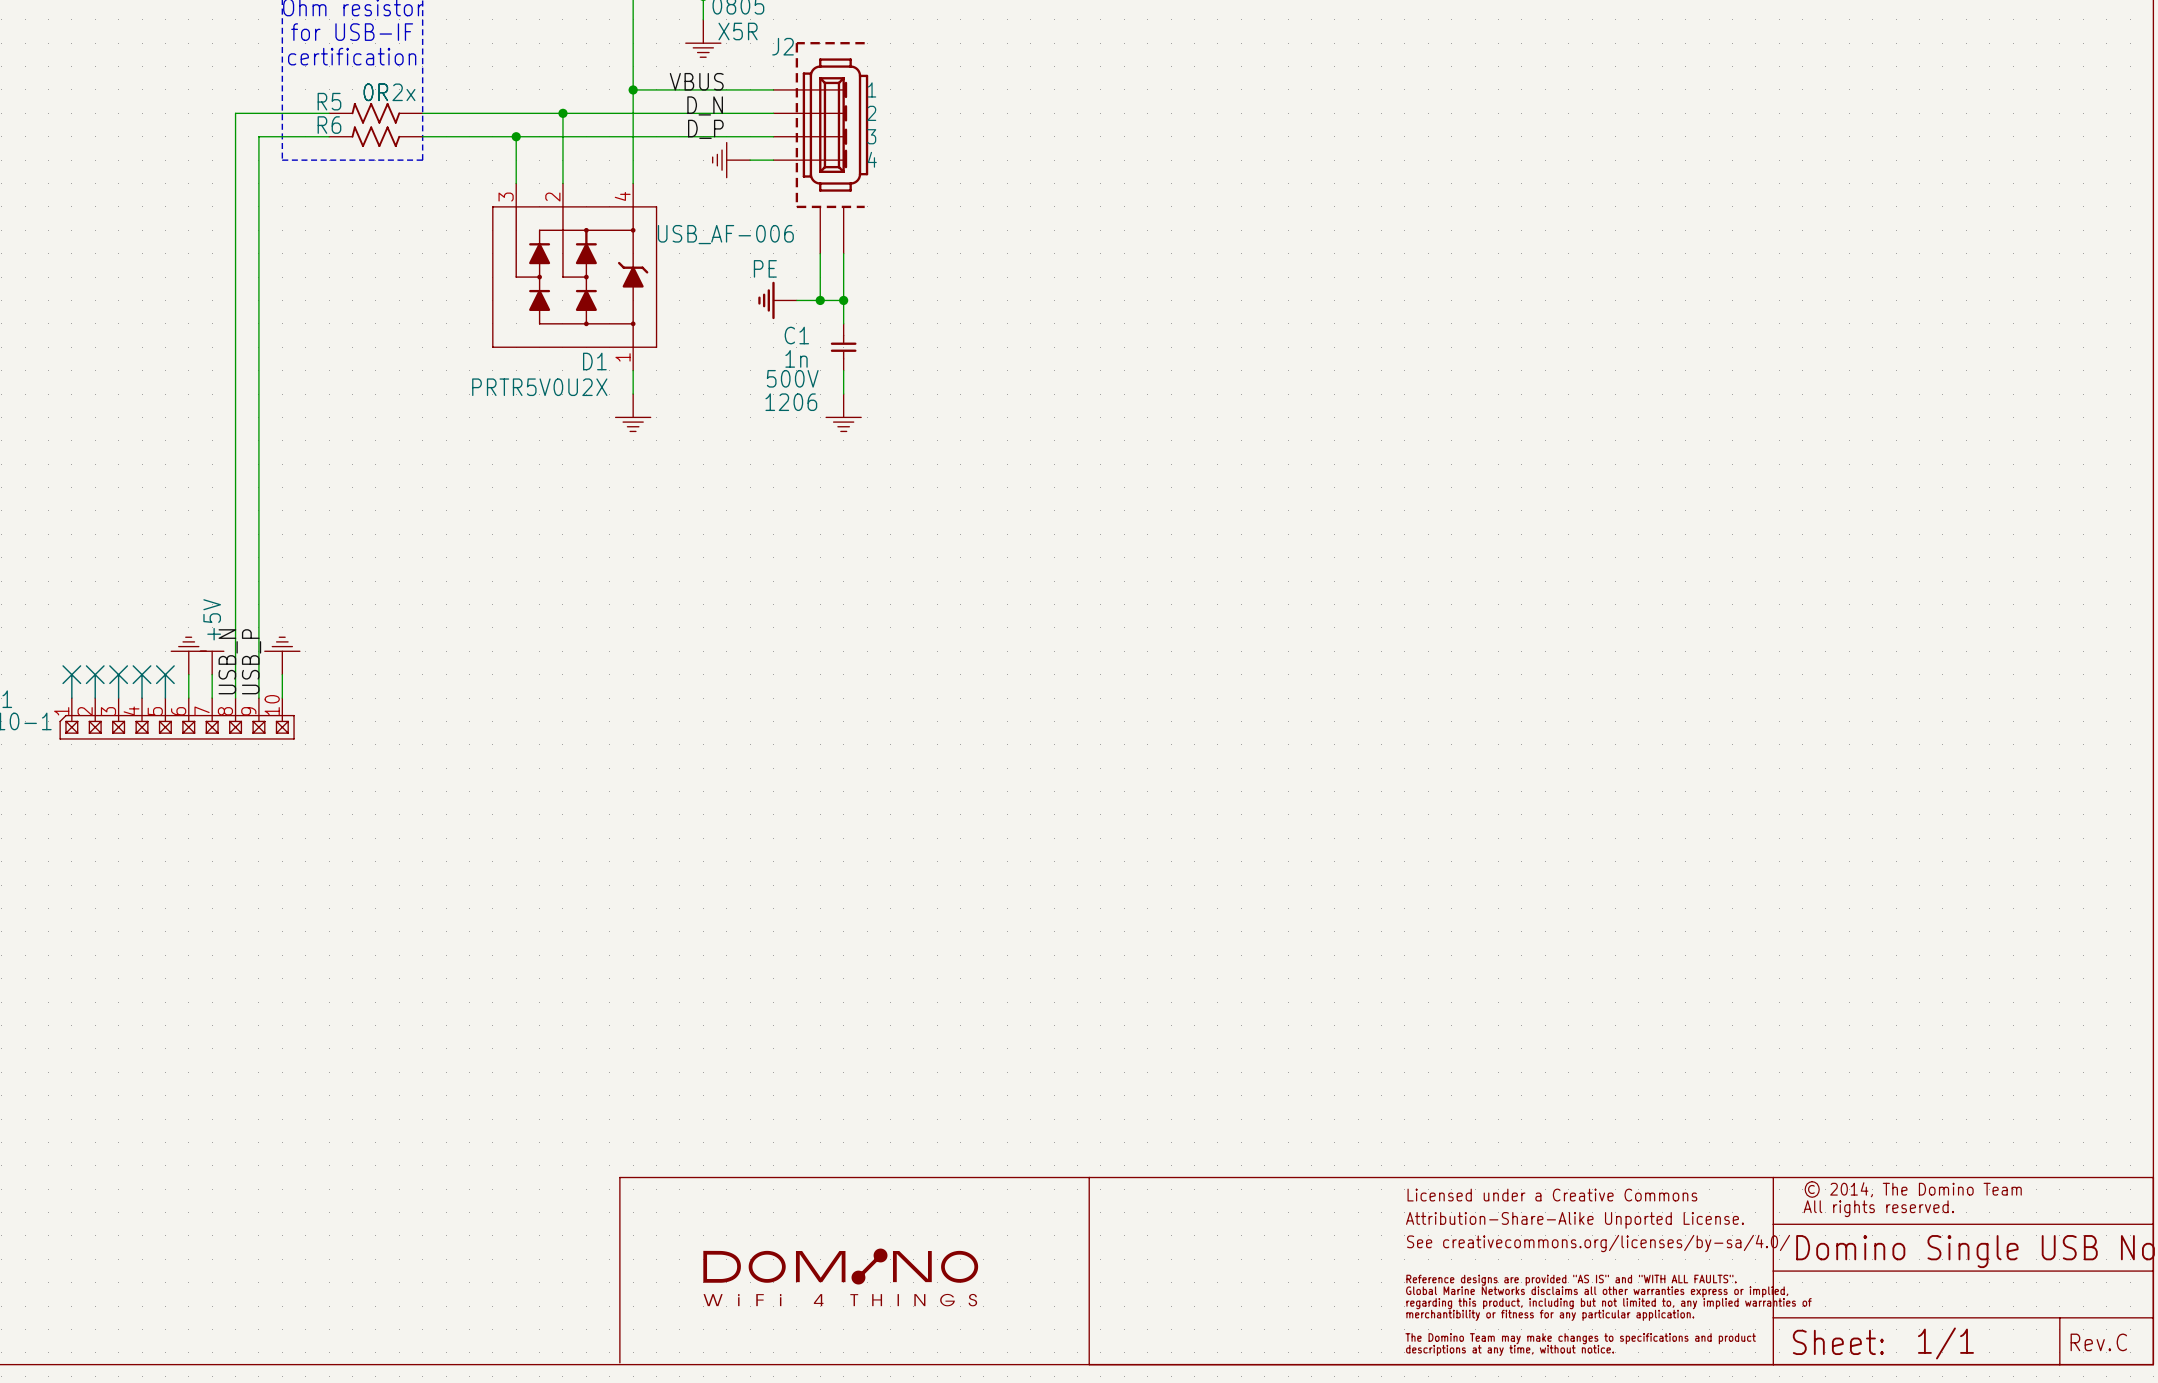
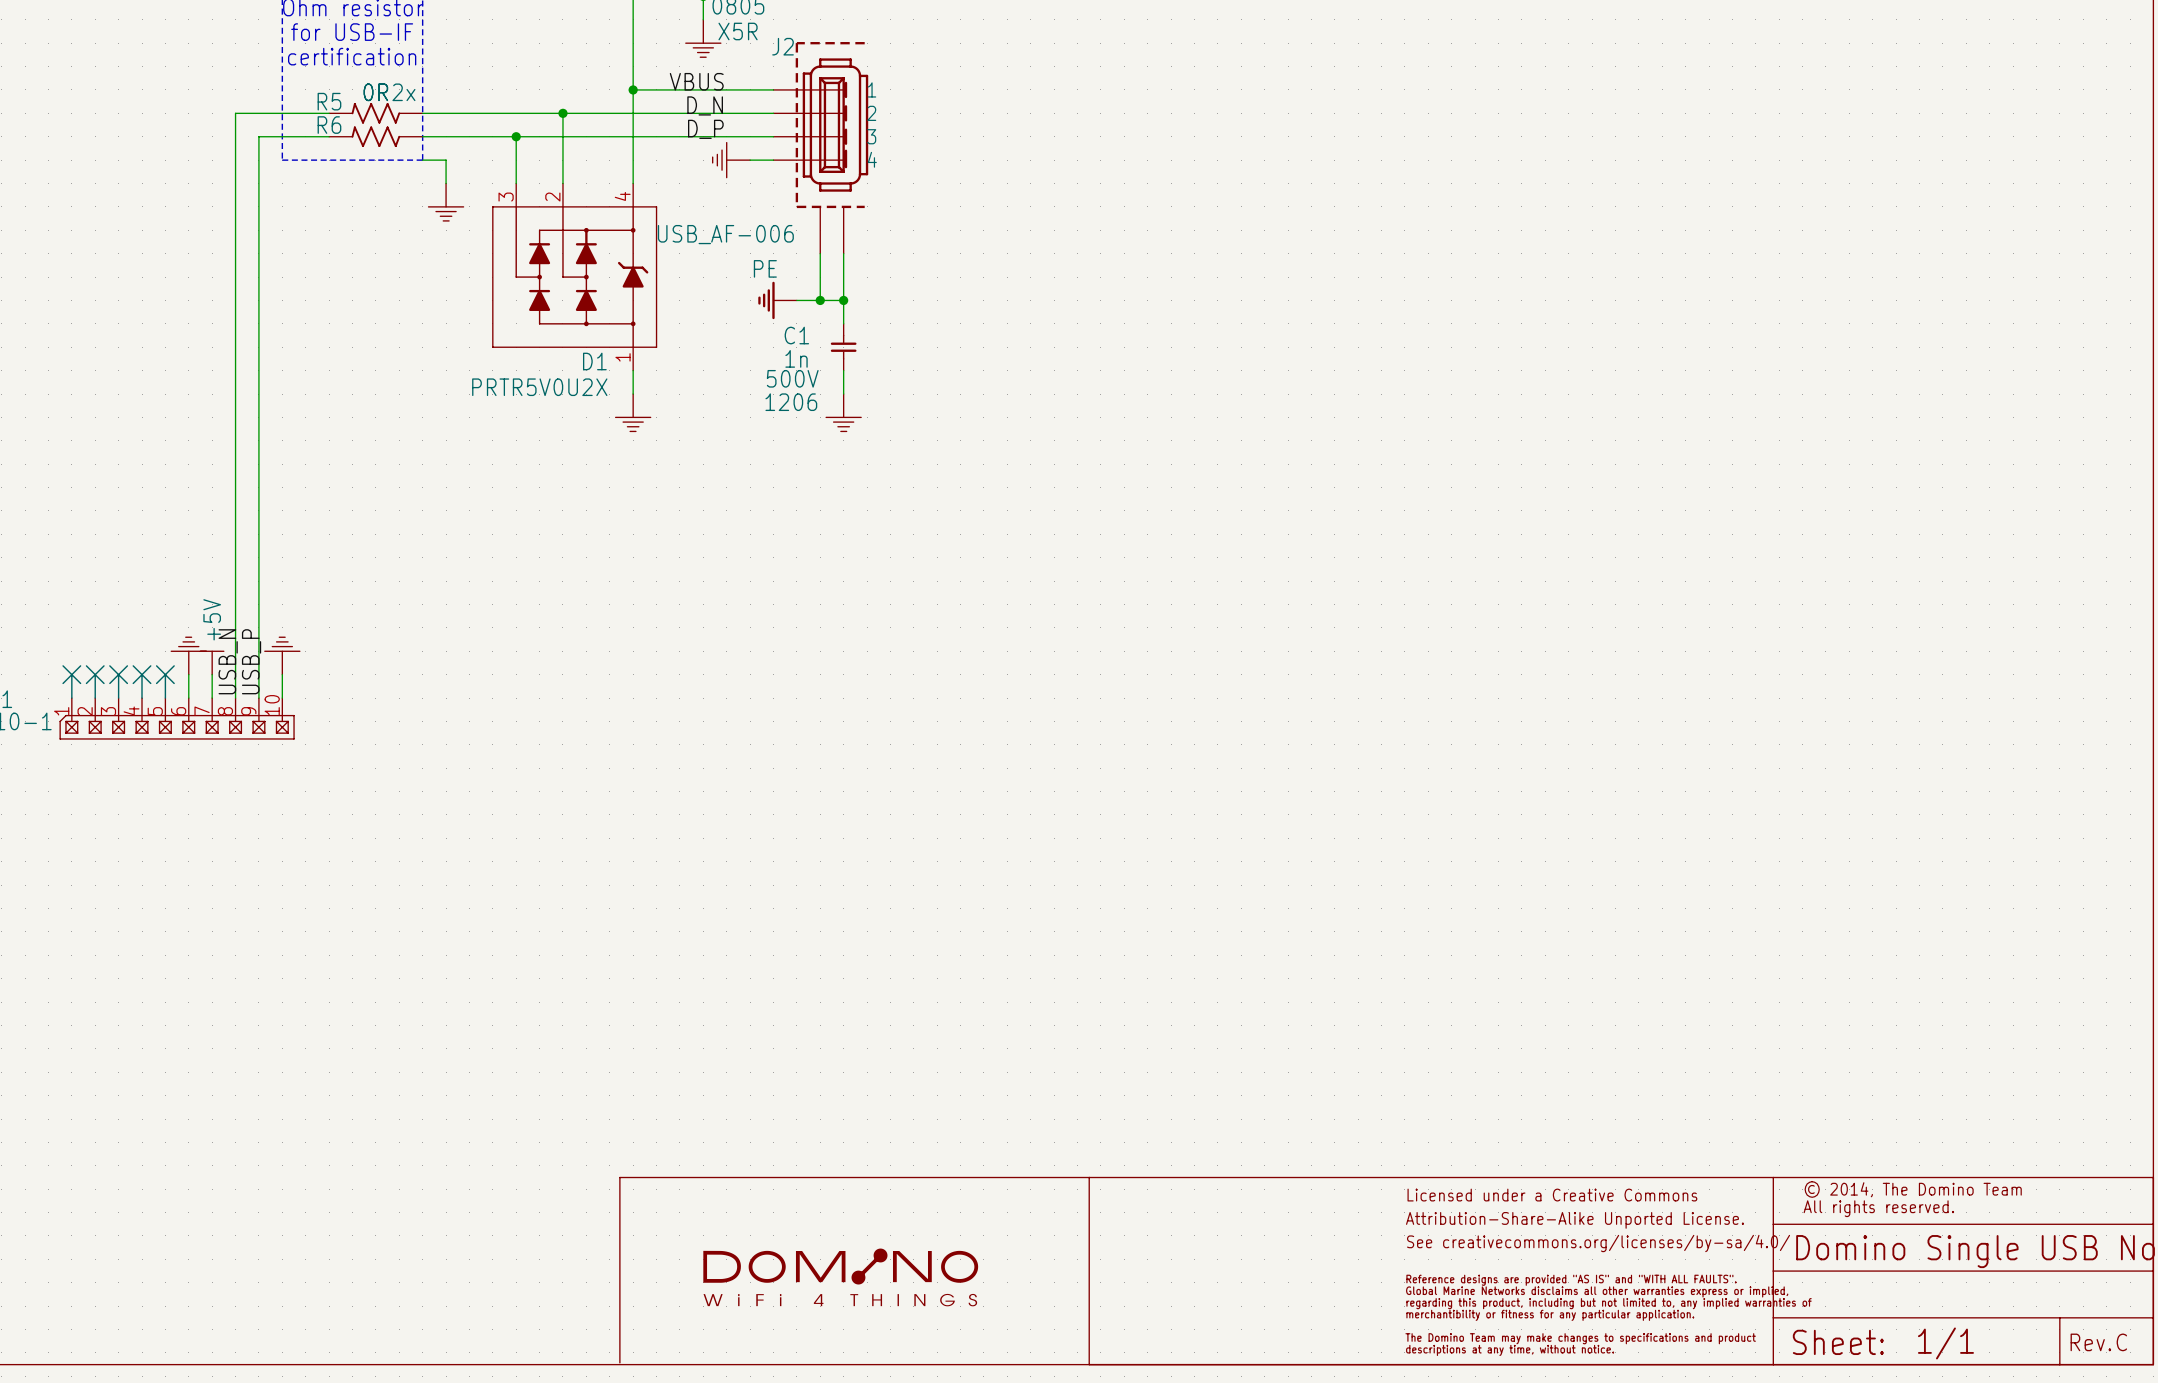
wire: none -> (422, 160) (446, 160) (446, 183)
power symbol: none -> (446, 202)

